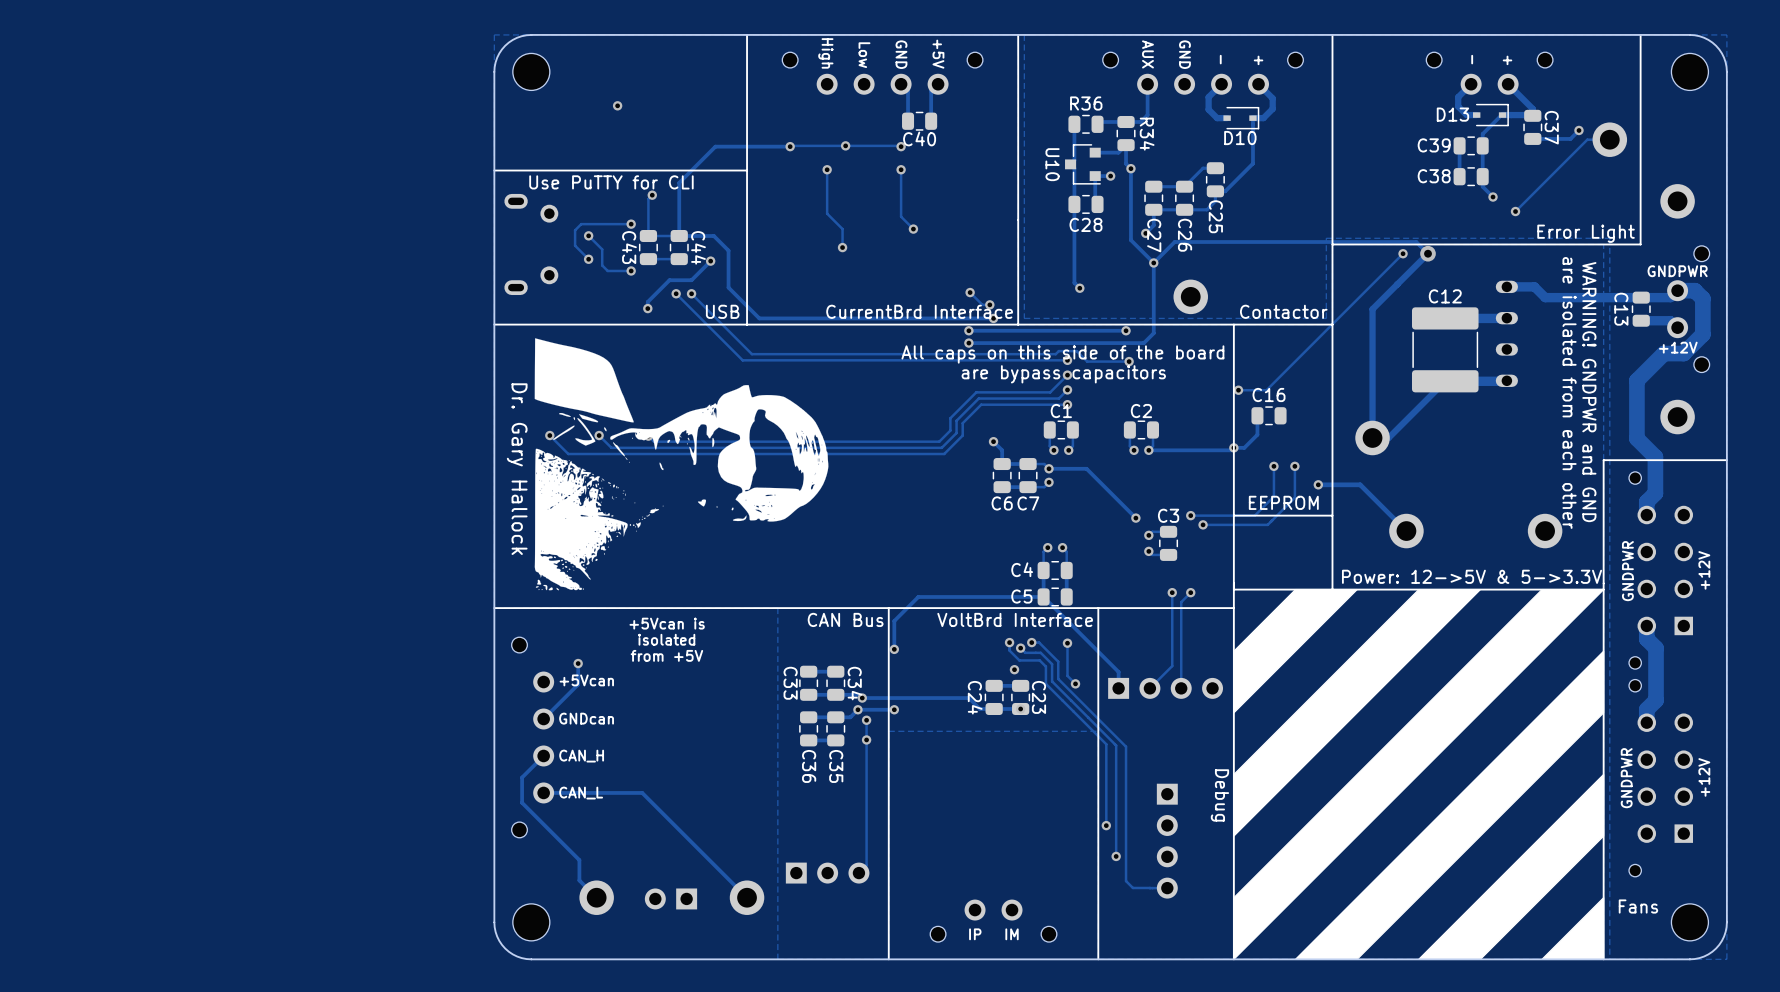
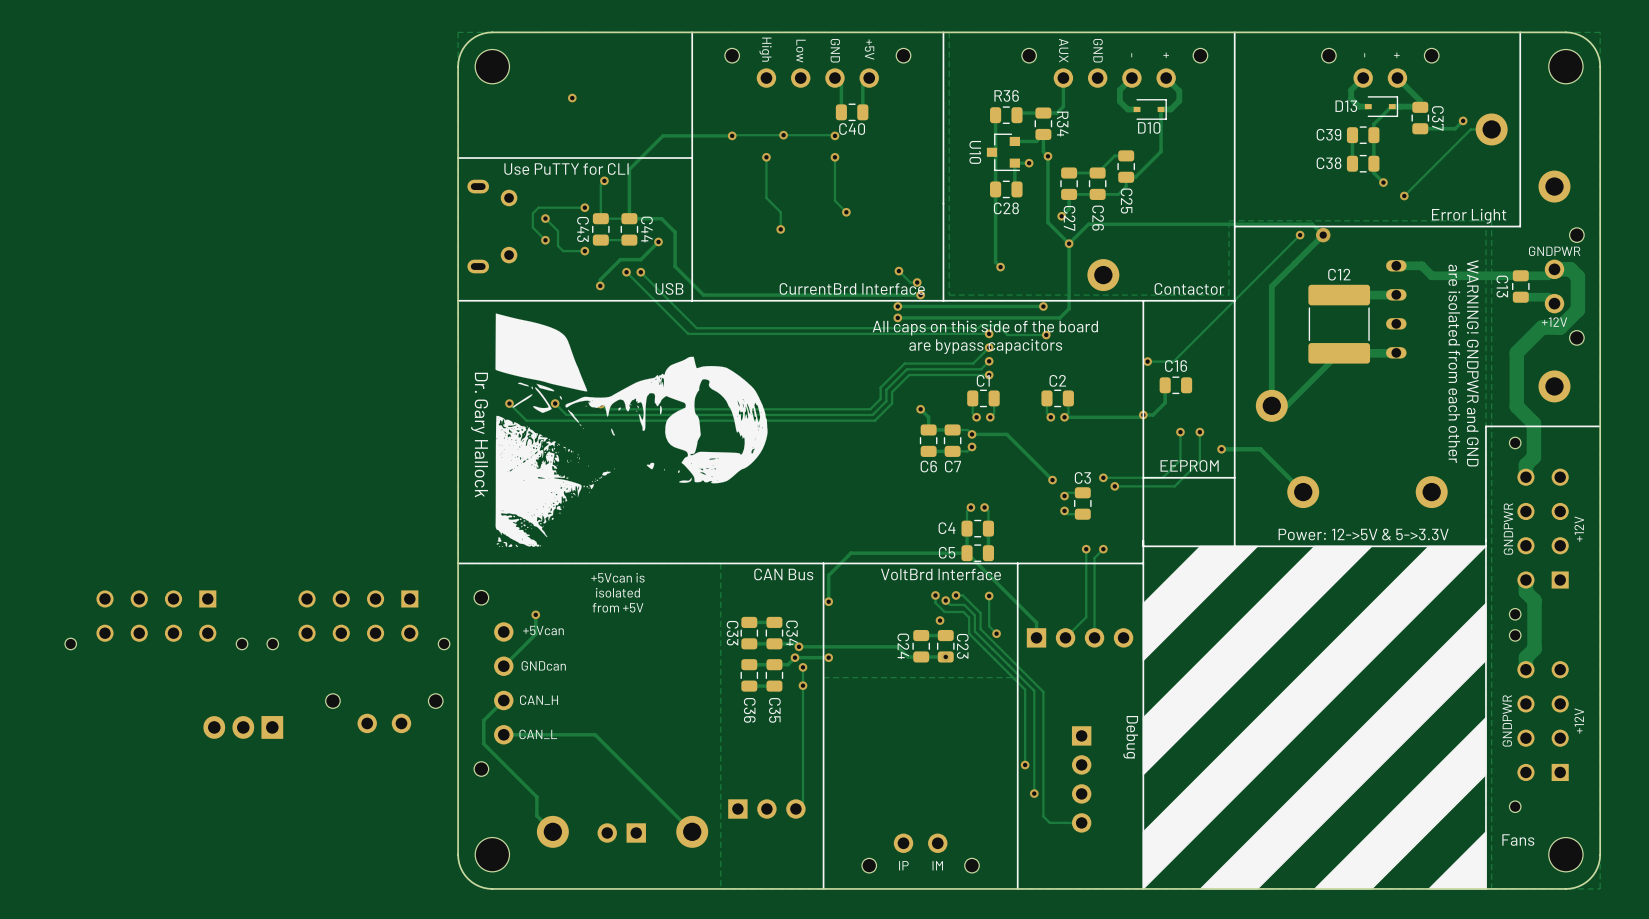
part: none -> (156, 620)
part: none -> (358, 620)
part: none -> (384, 713)
part: none -> (243, 727)

